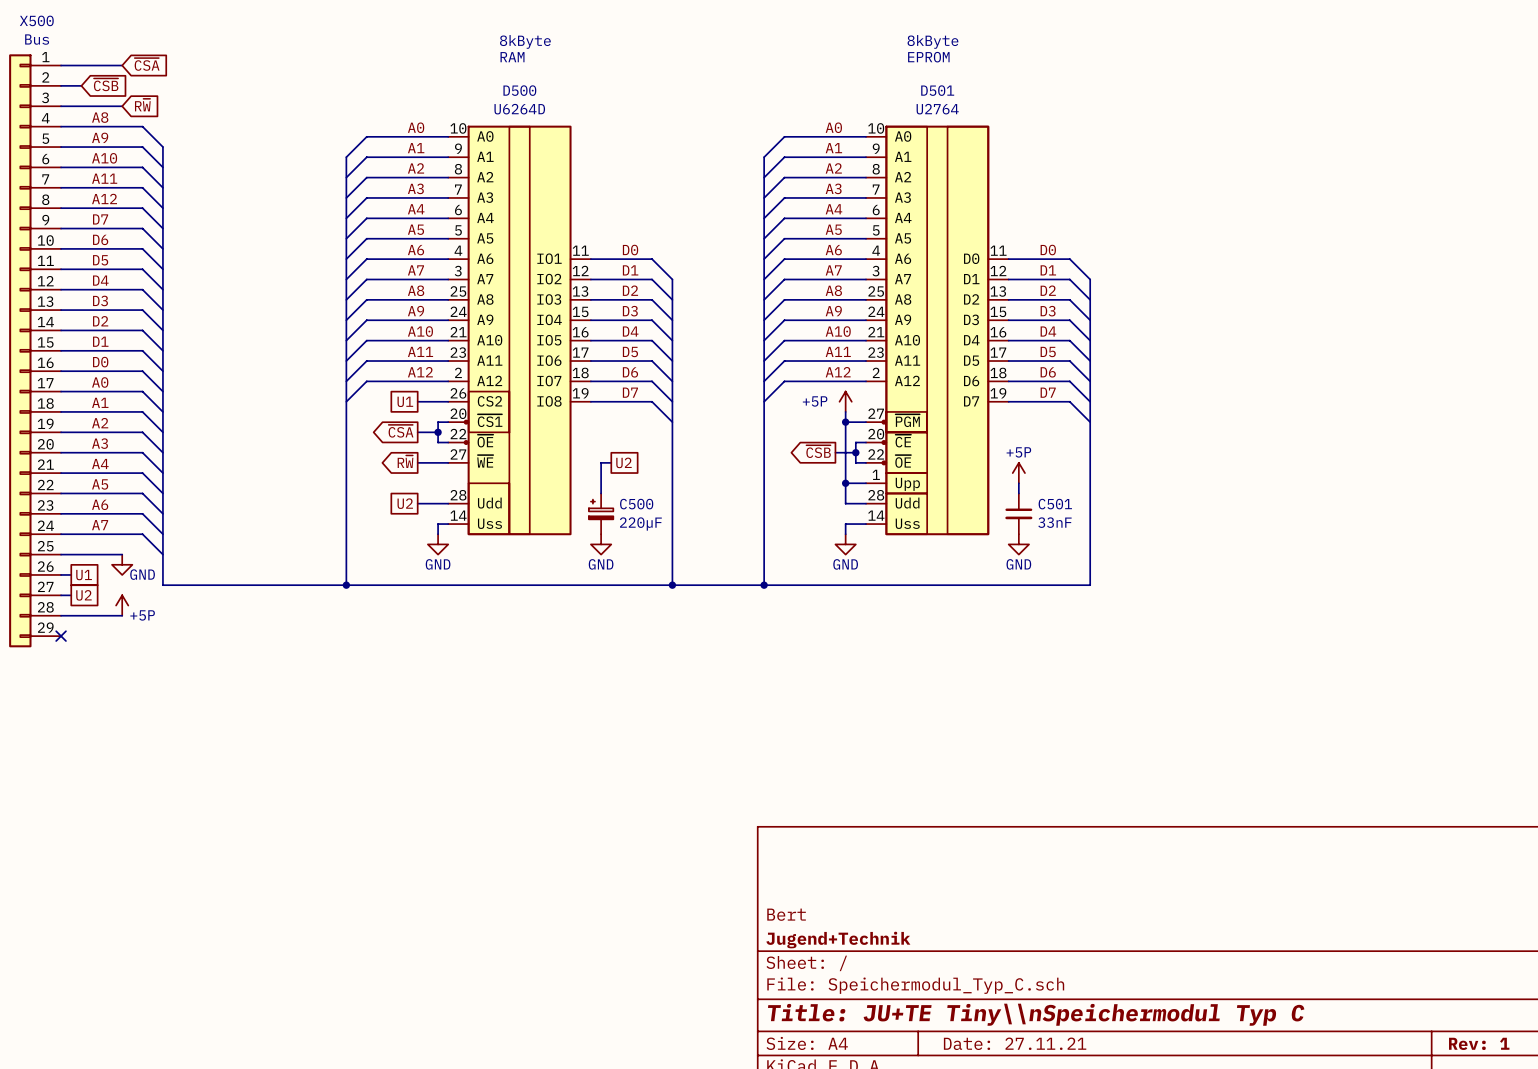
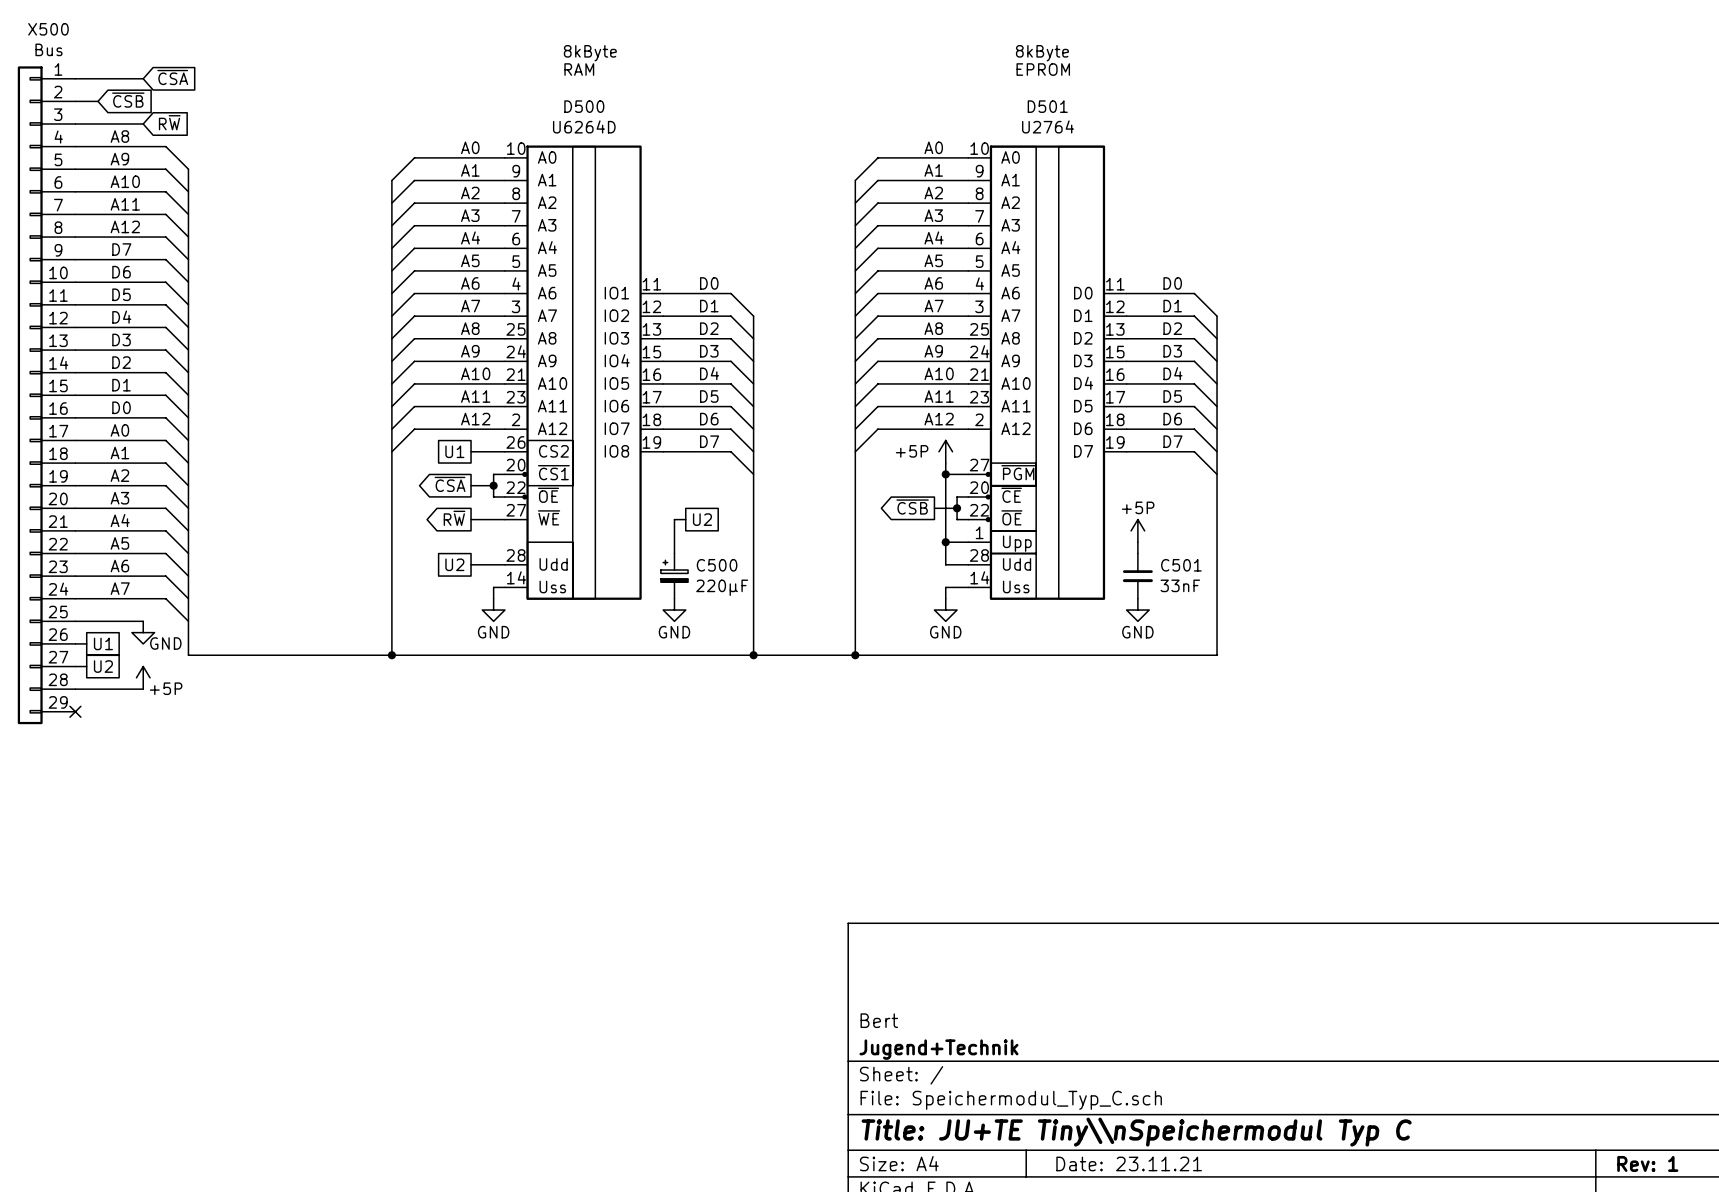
title block: Date: 27.11.21 (1015, 1043) -> Date: 23.11.21 (1129, 1163)

